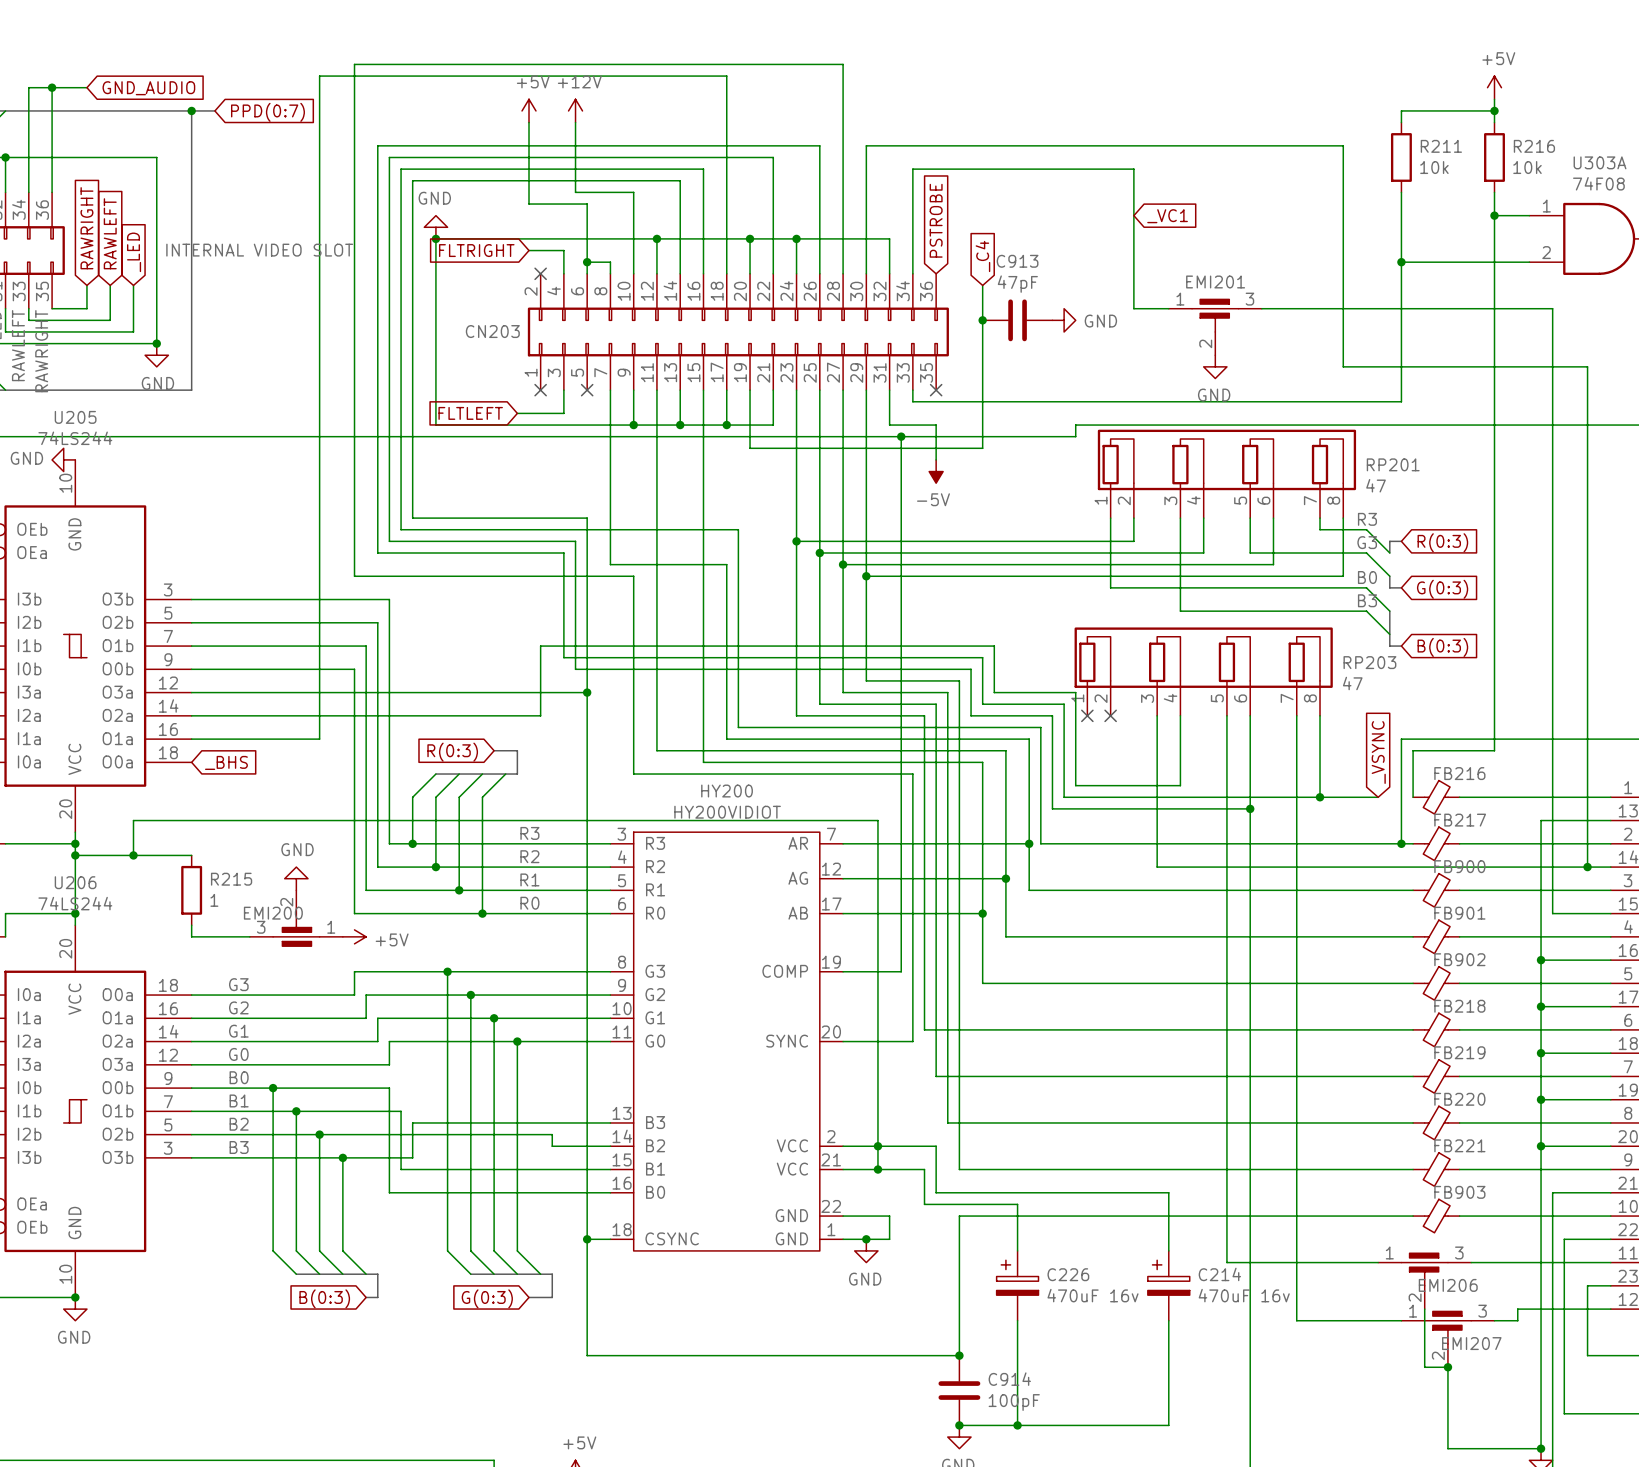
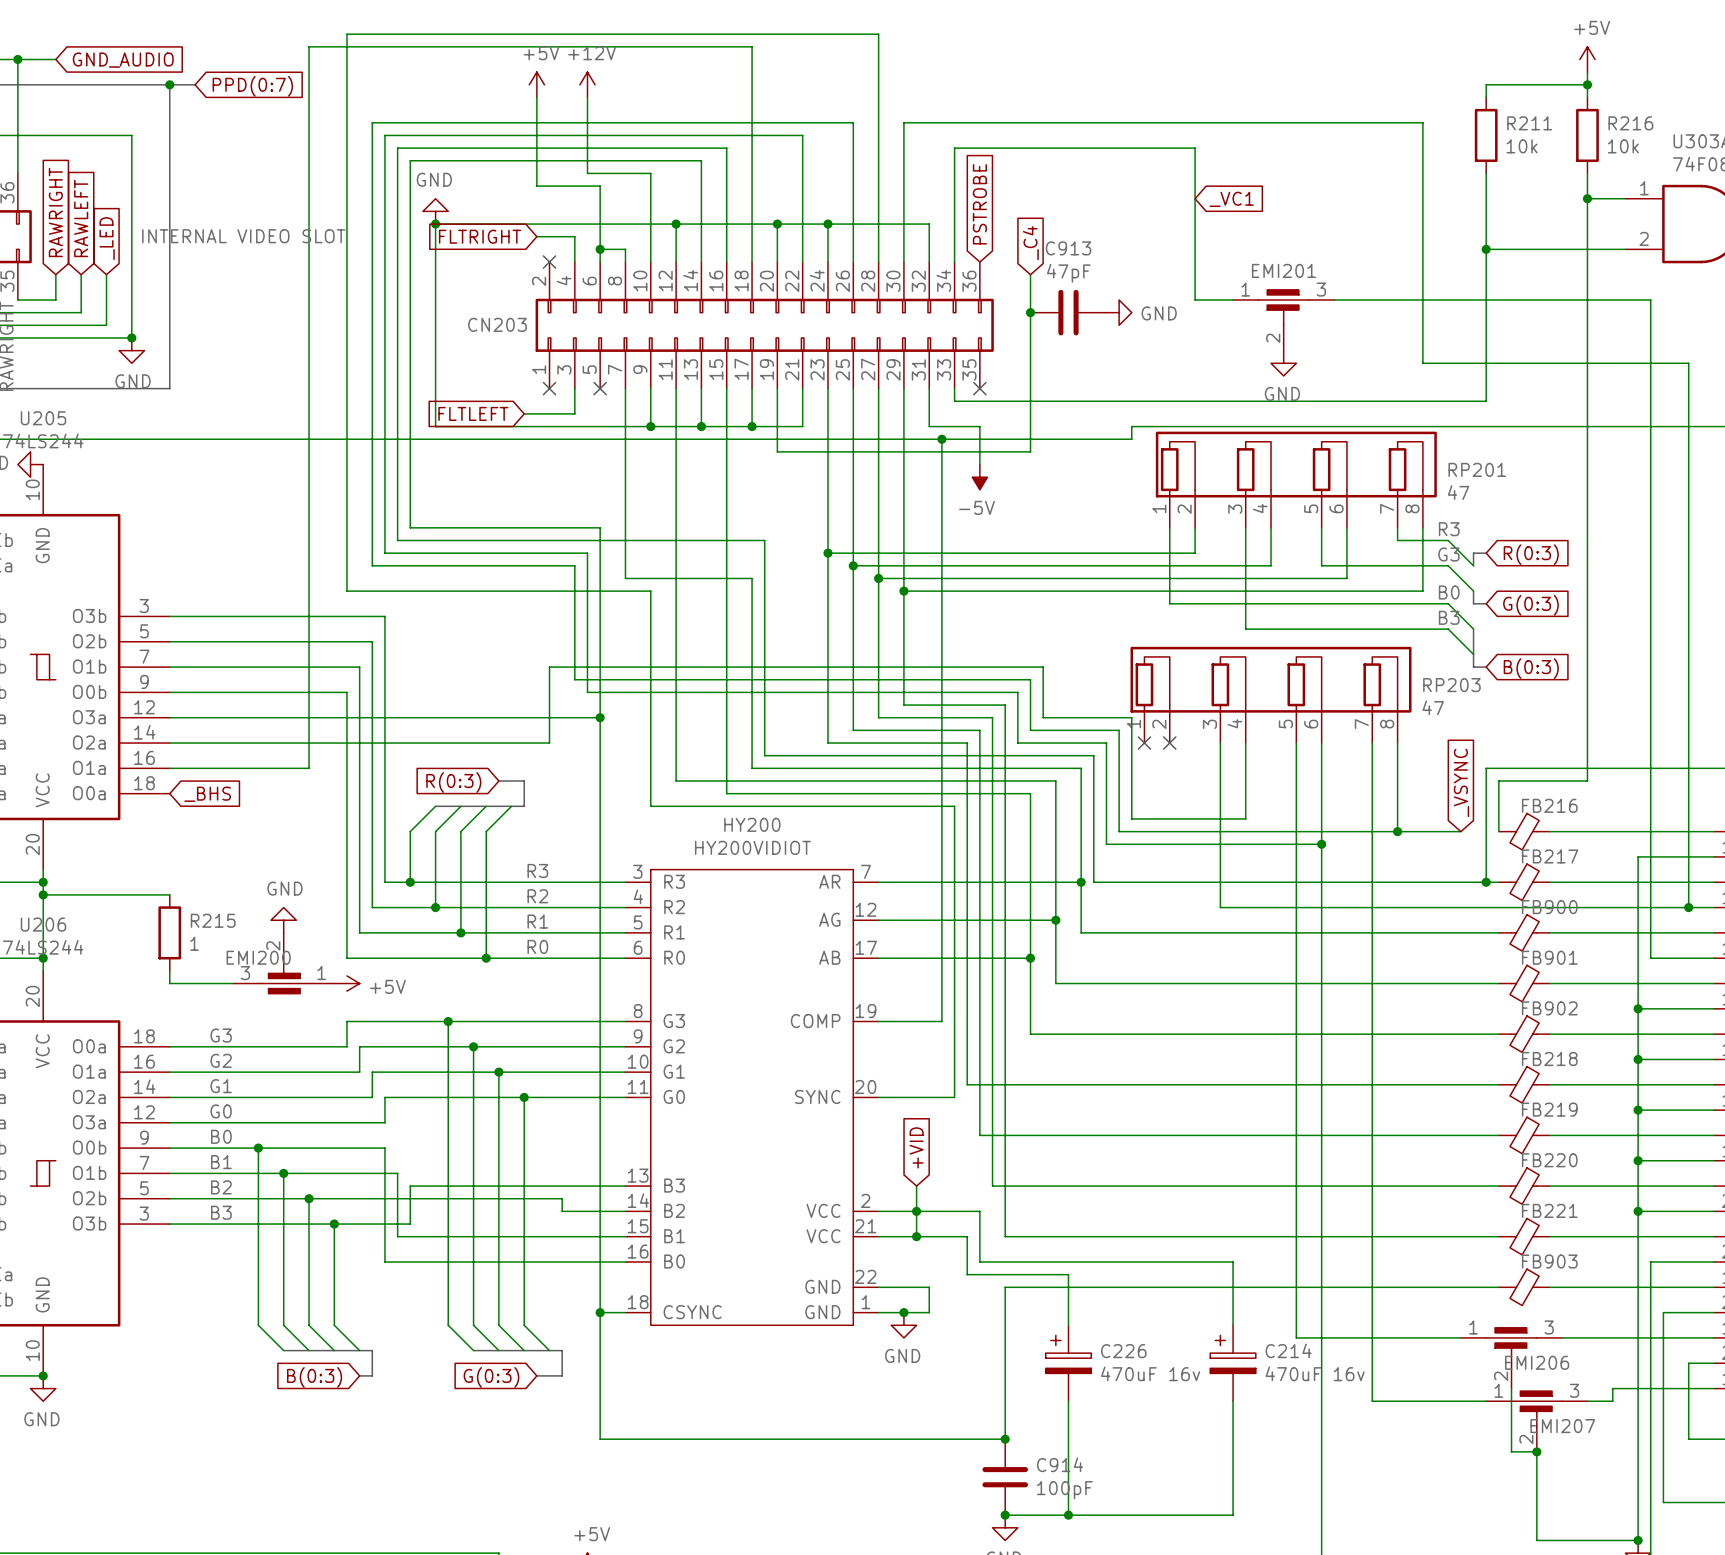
wire: (133, 855) (133, 820) (877, 820) (877, 1122) -> none
junction: (133, 855) -> none
global label: none -> +VID (916, 1147)

